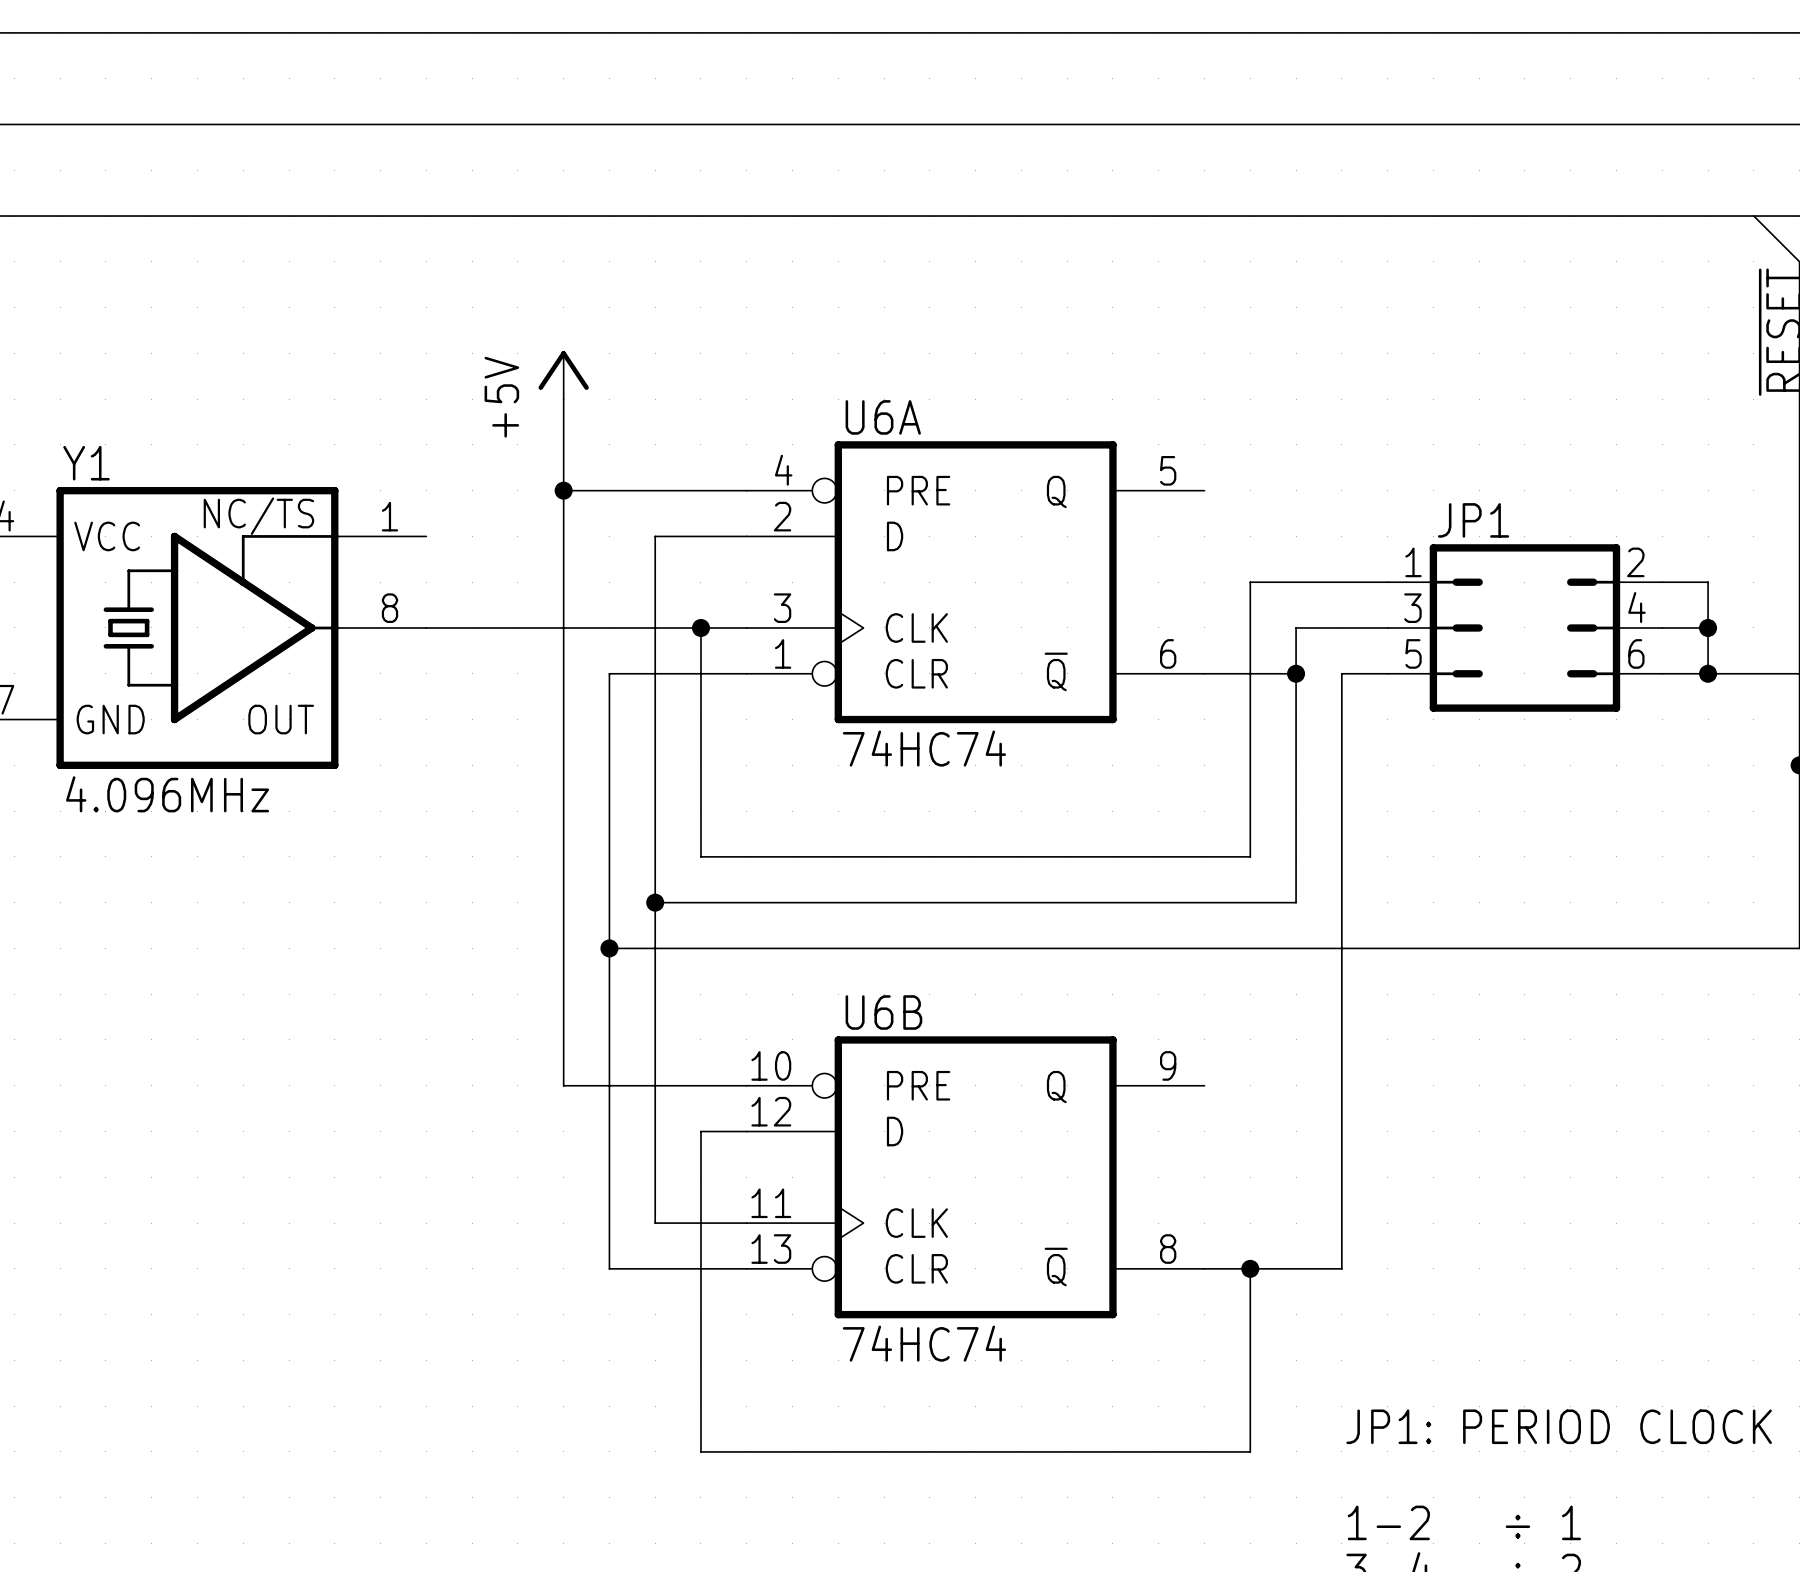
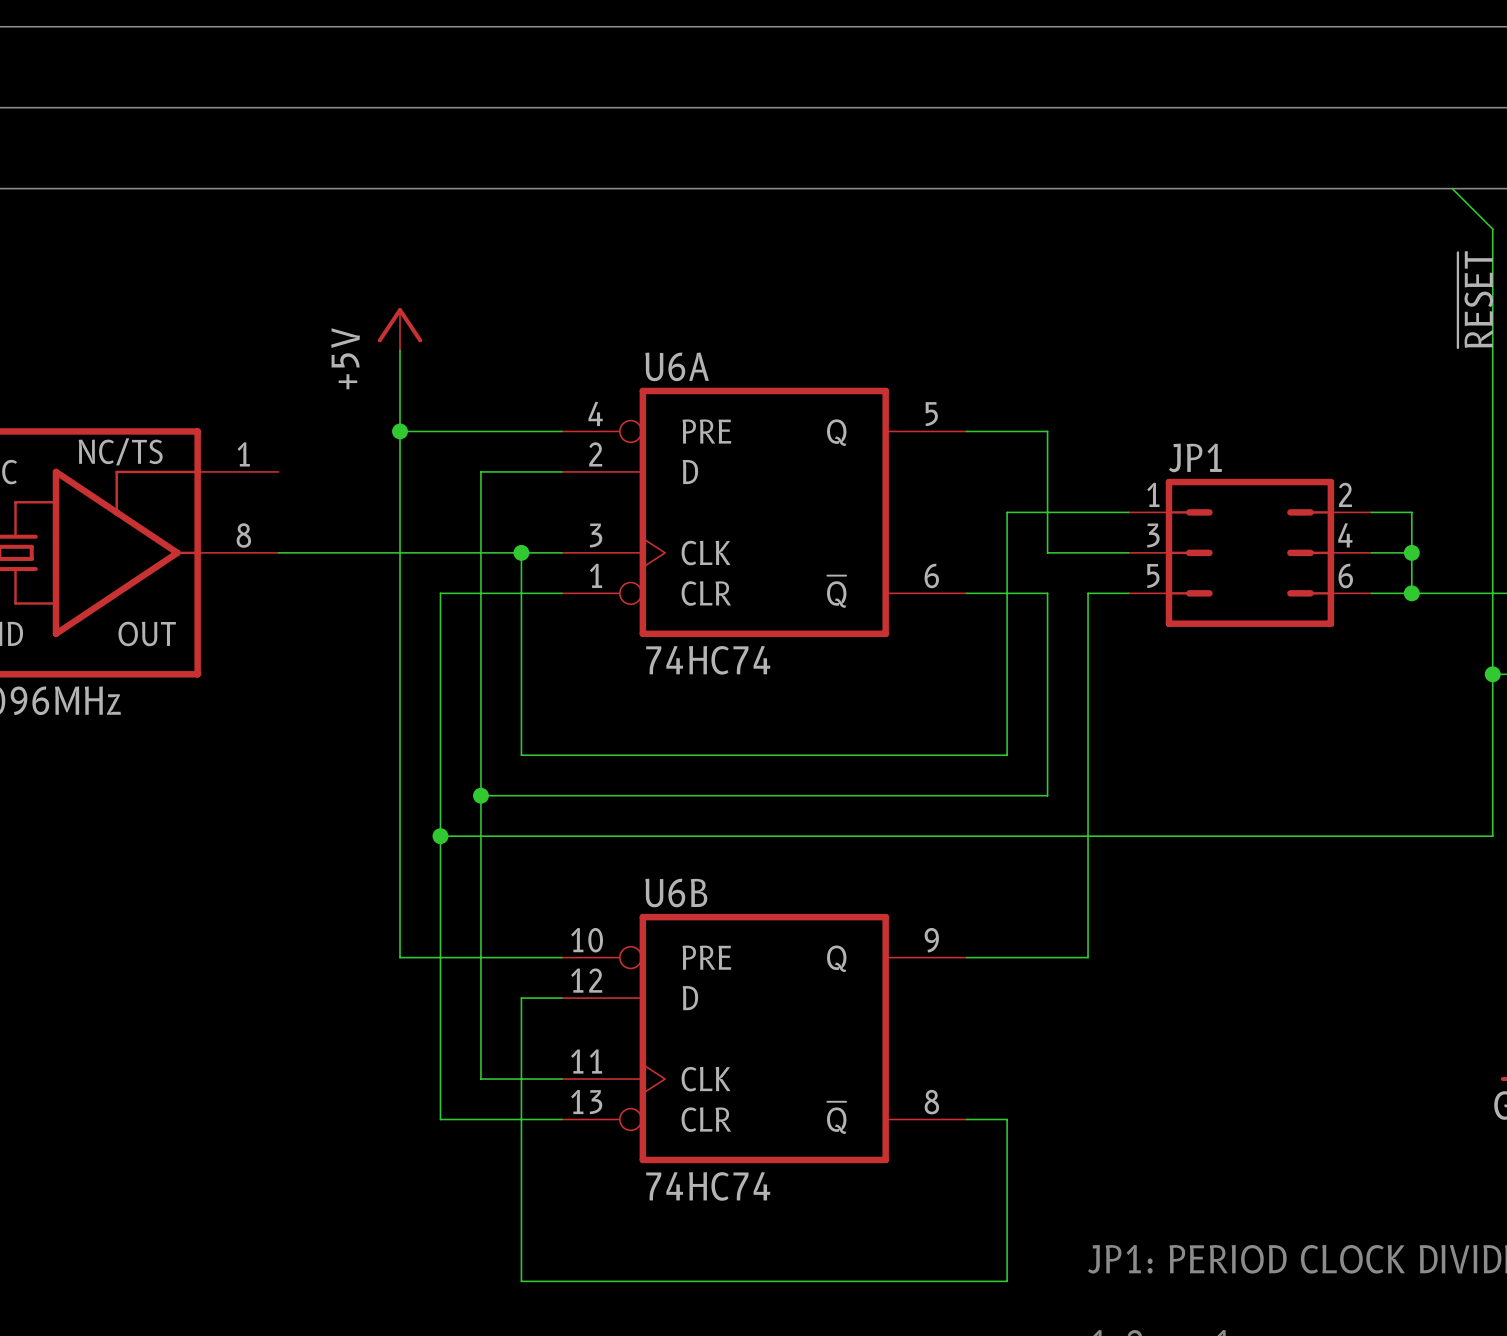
wire: (1296, 627) (1296, 673) -> (1047, 552) (1047, 431) (966, 431)
junction: (1296, 673) -> none
wire: (1341, 1085) (1341, 1268) (1250, 1268) -> (1088, 957) (966, 957)
junction: (1250, 1268) -> none

